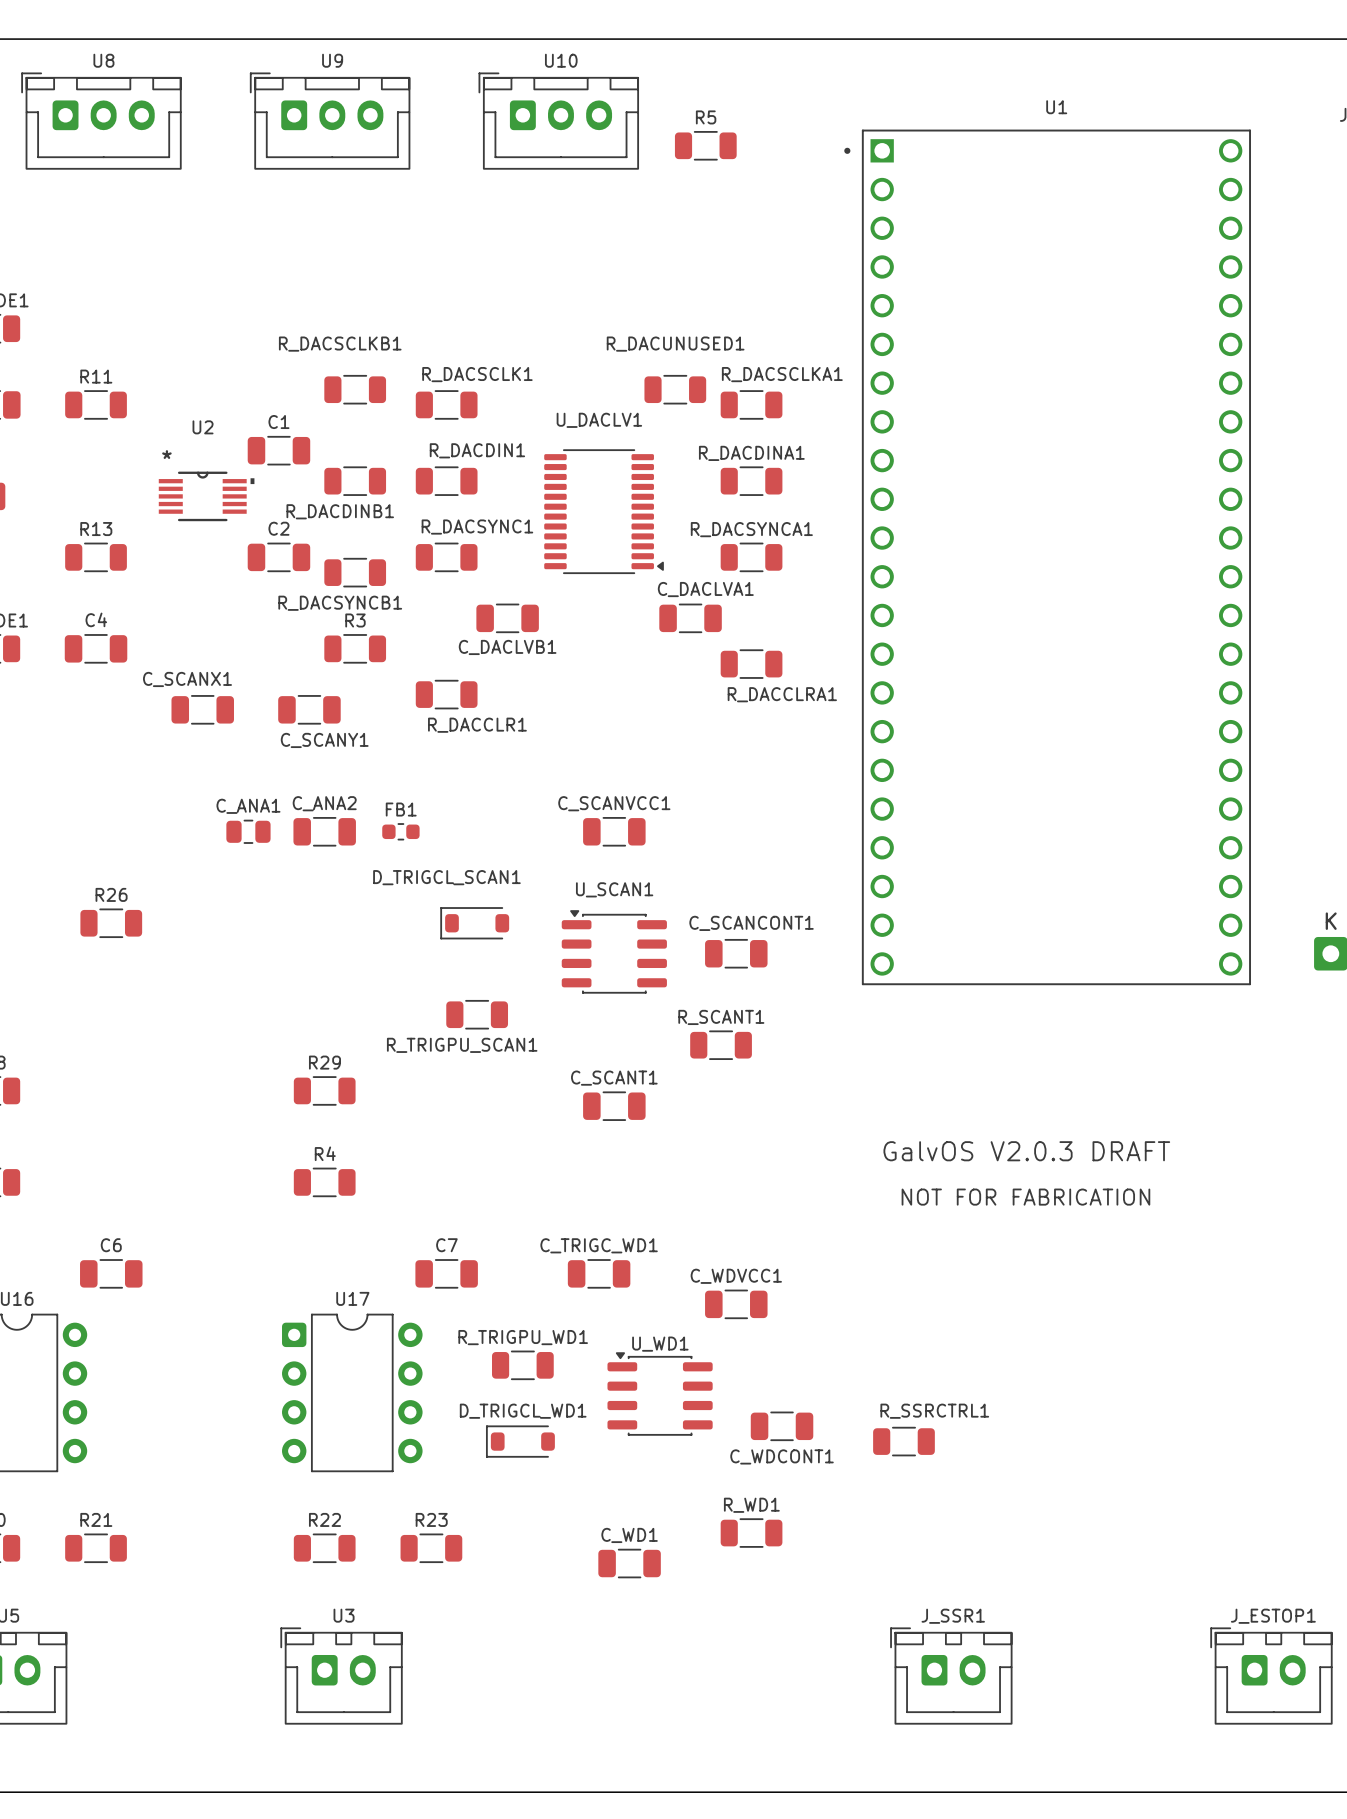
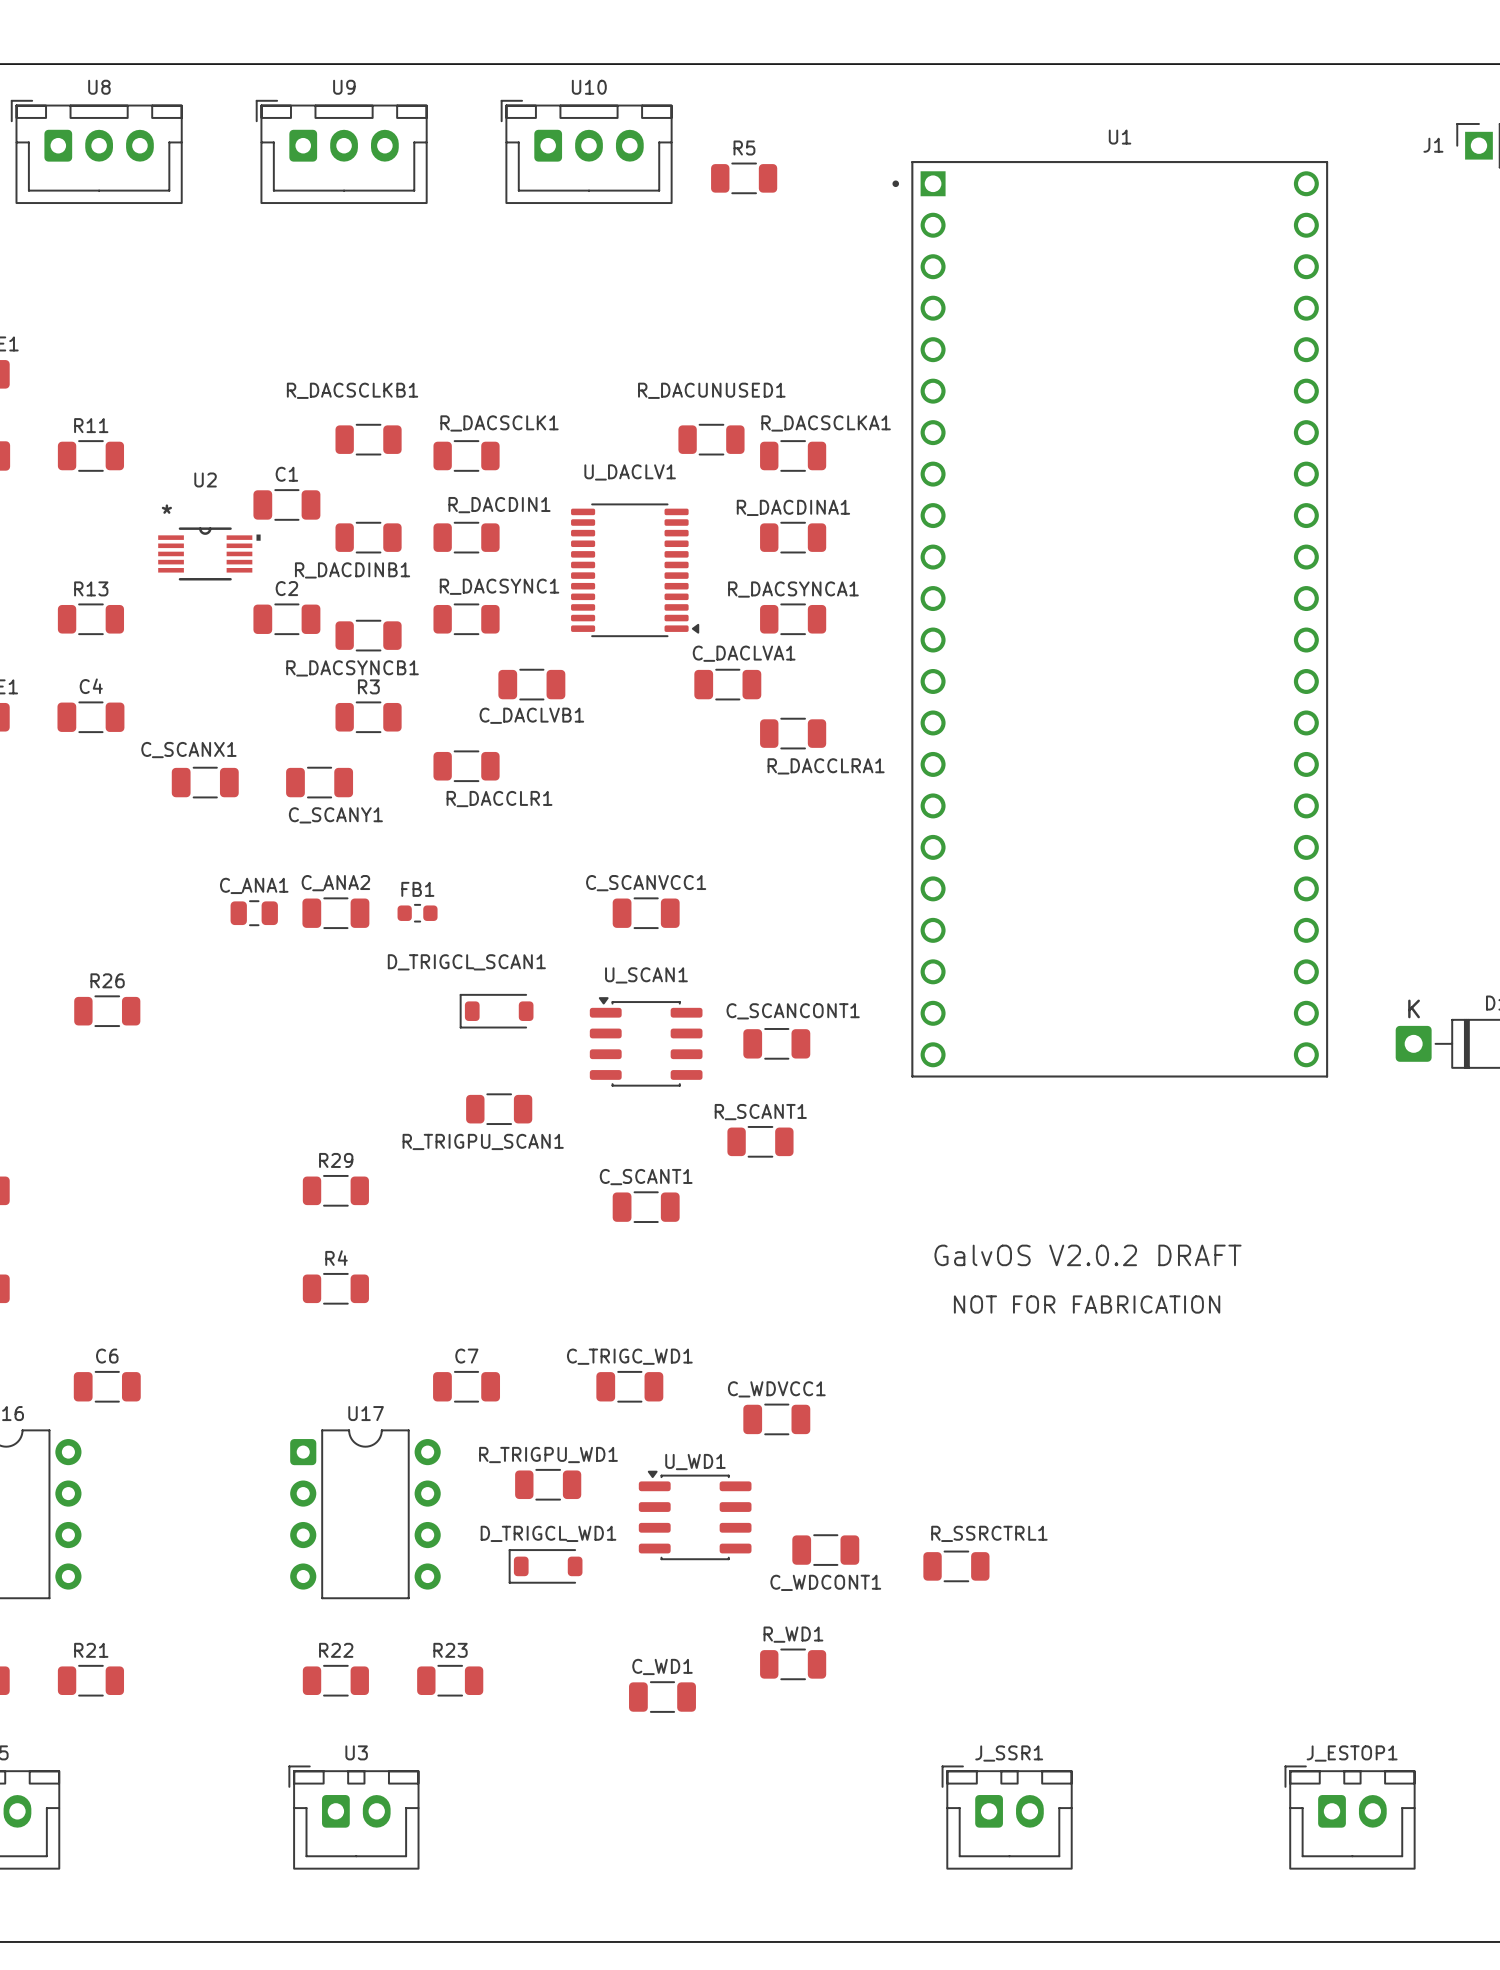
text: GalvOS V2.0.3 DRAFT (1026, 1151) -> GalvOS V2.0.2 DRAFT (1088, 1255)

